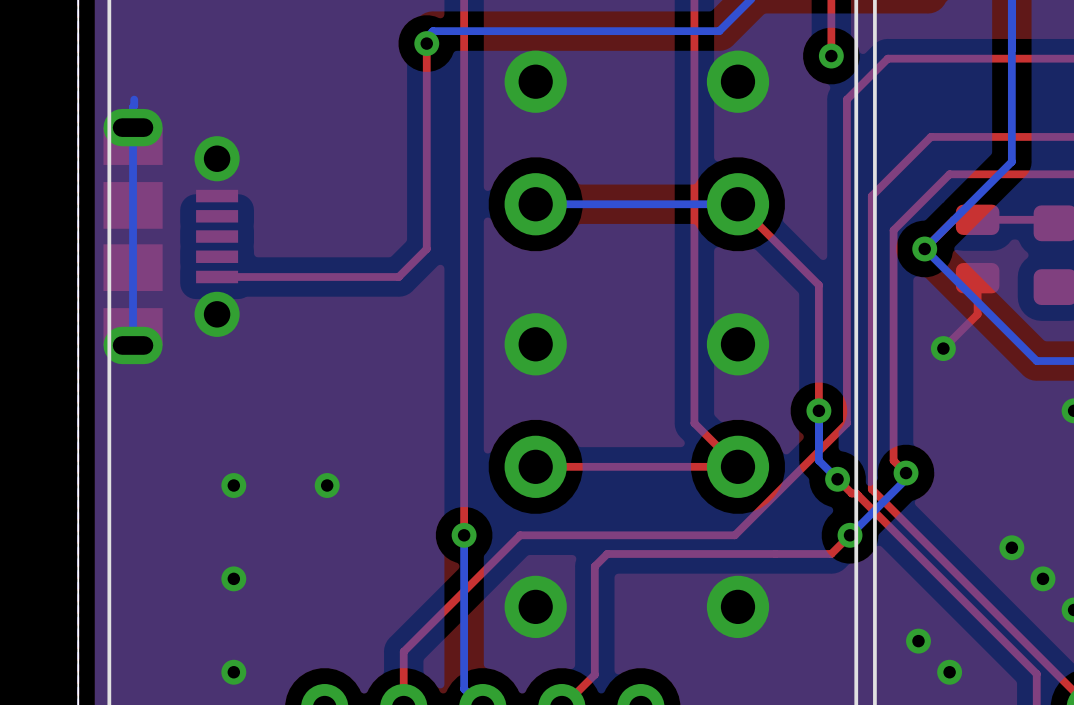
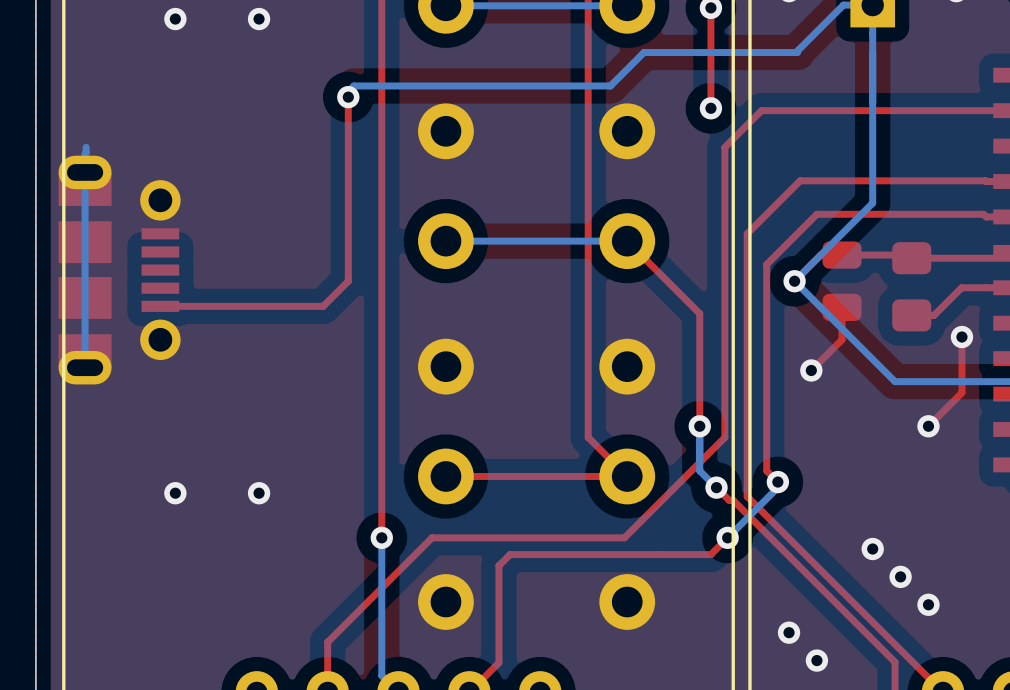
via: (233, 578) -> none
via: (233, 672) -> none

